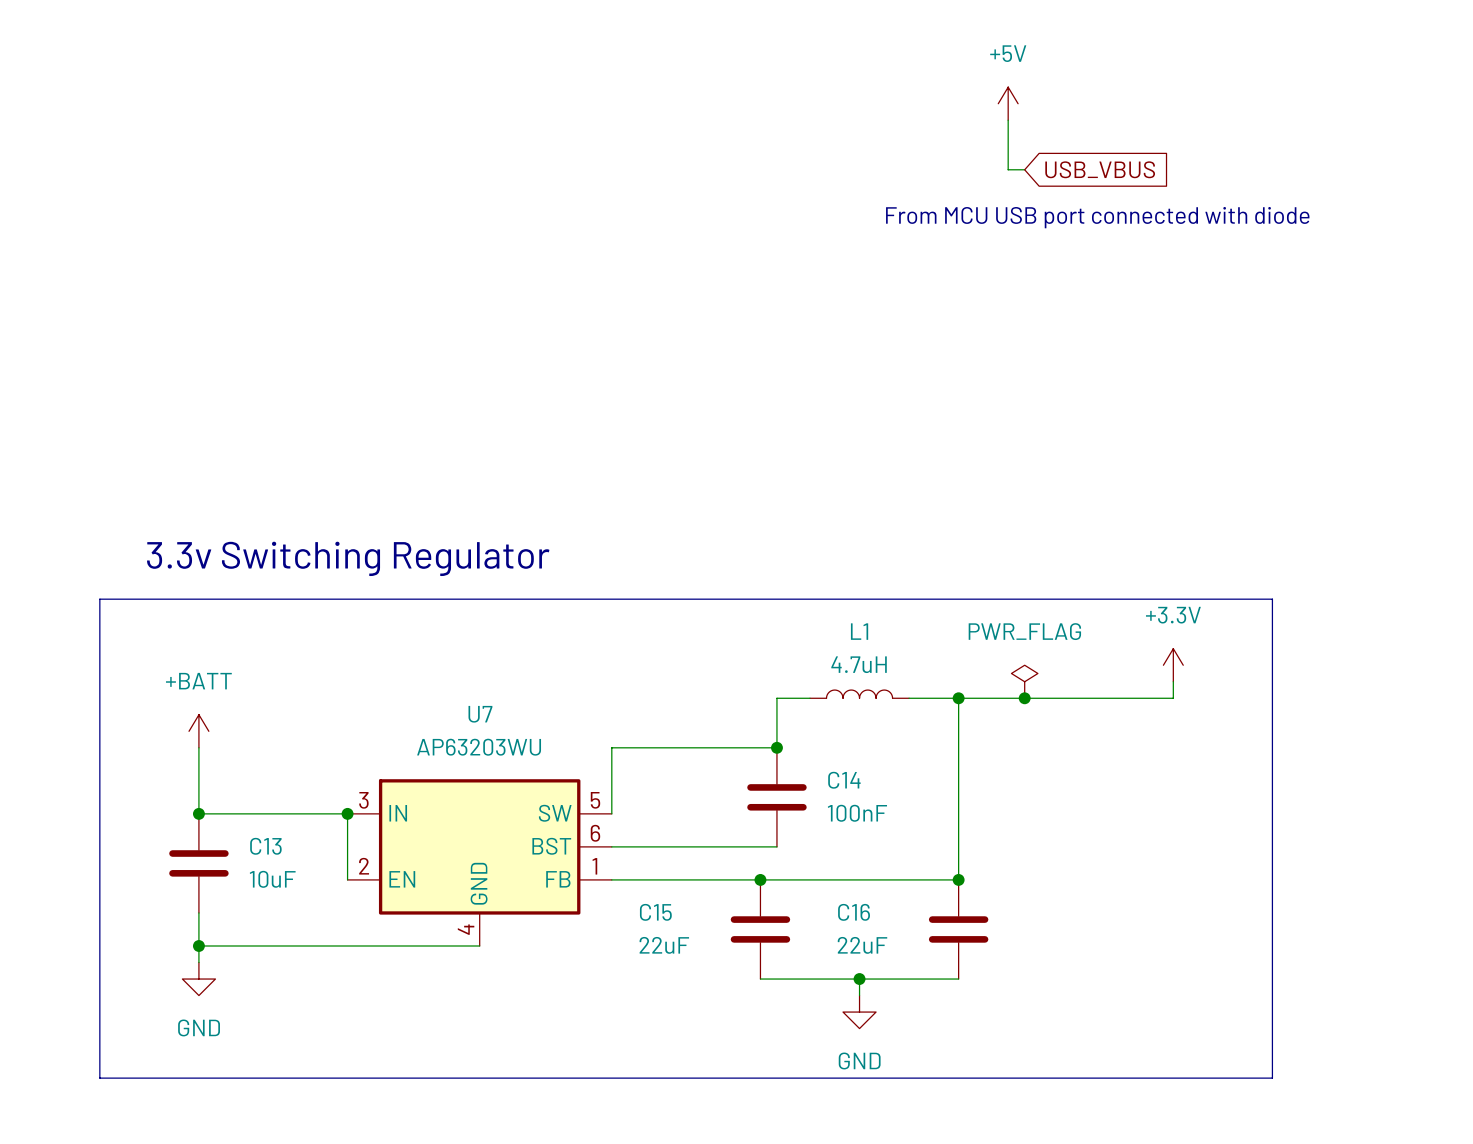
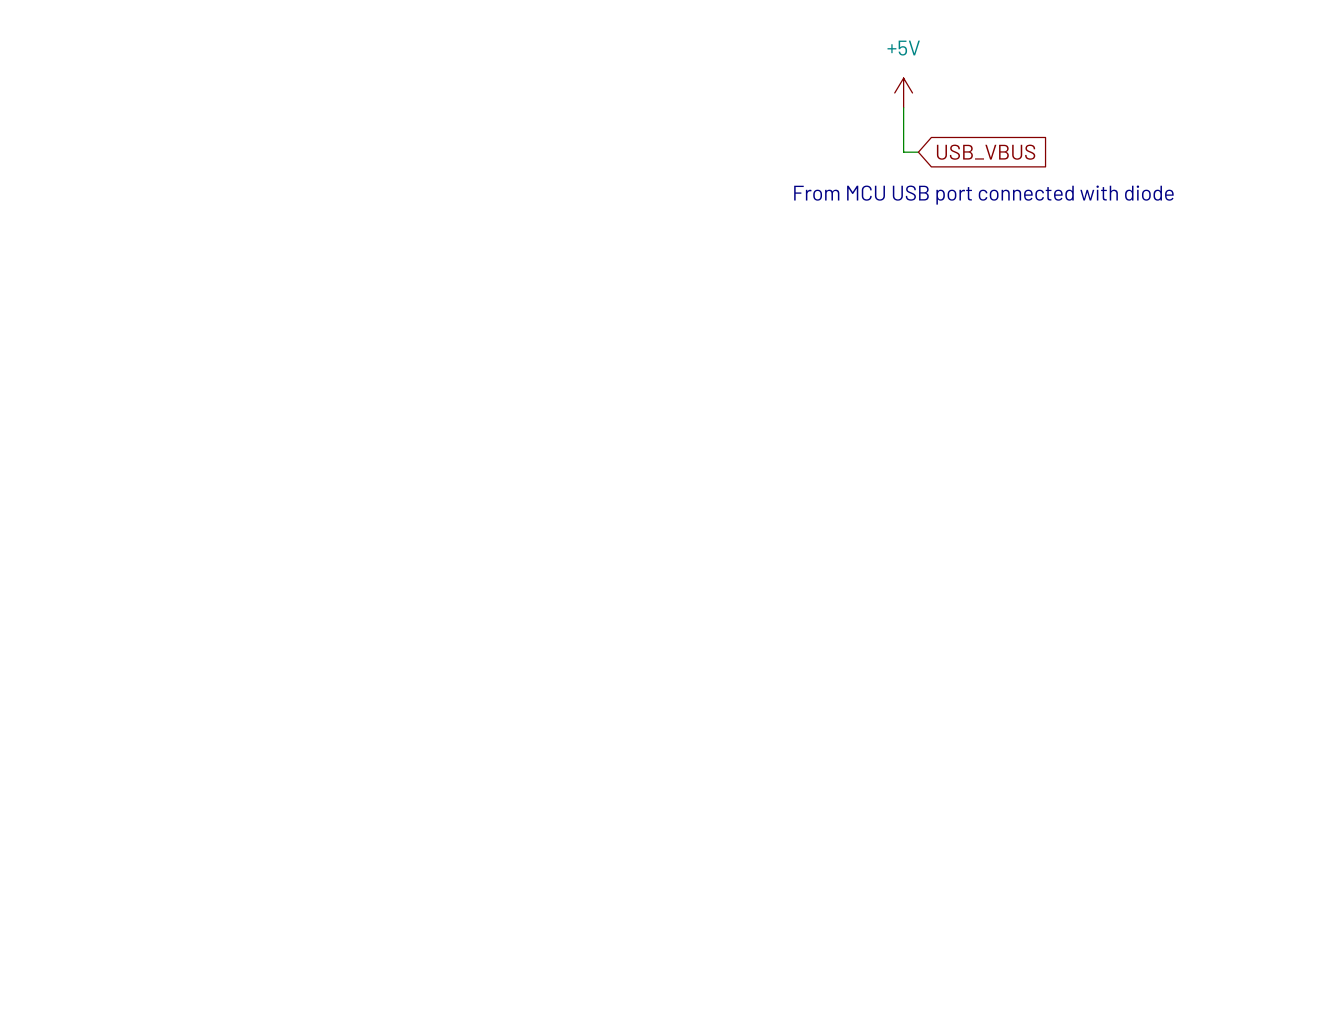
text: 3.3v Switching Regulator (348, 558) -> none
line: (99, 599) (1272, 599) (1272, 1078) (99, 1078) (99, 599) -> none
power symbol: +3.3V (1173, 665) -> none
power symbol: PWR_FLAG (1024, 681) -> none
wire: (1173, 681) (1173, 698) (909, 698) -> none
L1: 4.7uH (859, 694) -> none
wire: (809, 698) (776, 698) (776, 747) (611, 747) (611, 813) -> none
wire: (958, 698) (958, 879) (611, 879) -> none
junction: (958, 698) -> none
junction: (1024, 698) -> none
power symbol: +BATT (198, 731) -> none
wire: (198, 747) (198, 813) (347, 813) (347, 879) -> none
junction: (776, 747) -> none
C14: 100nF (776, 797) -> none
junction: (198, 813) -> none
junction: (347, 813) -> none
wire: (611, 846) (776, 846) -> none
U7: AP63203WU (479, 862) -> none
C13: 10uF (198, 863) -> none
junction: (760, 879) -> none
junction: (958, 879) -> none
wire: (198, 912) (198, 962) -> none
C15: 22uF (760, 929) -> none
C16: 22uF (958, 929) -> none
wire: (198, 946) (479, 946) -> none
junction: (198, 946) -> none
power symbol: GND (198, 979) -> none
wire: (760, 979) (958, 979) -> none
wire: (859, 979) (859, 995) -> none
junction: (859, 979) -> none
power symbol: GND (859, 1012) -> none

